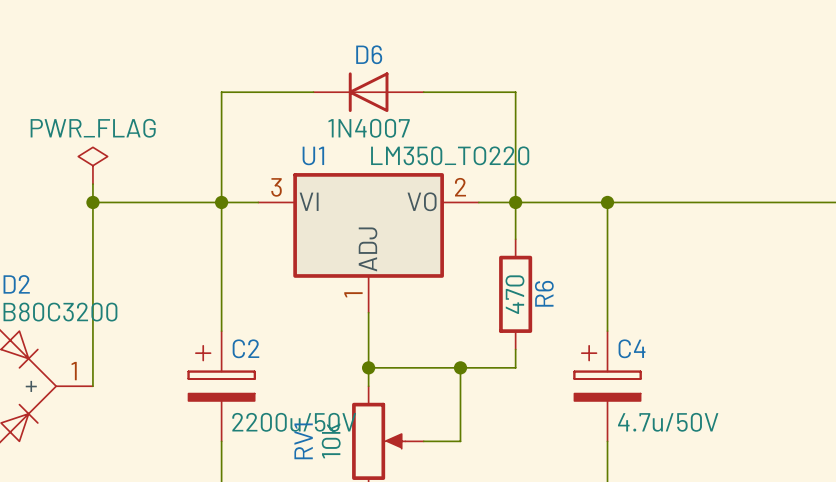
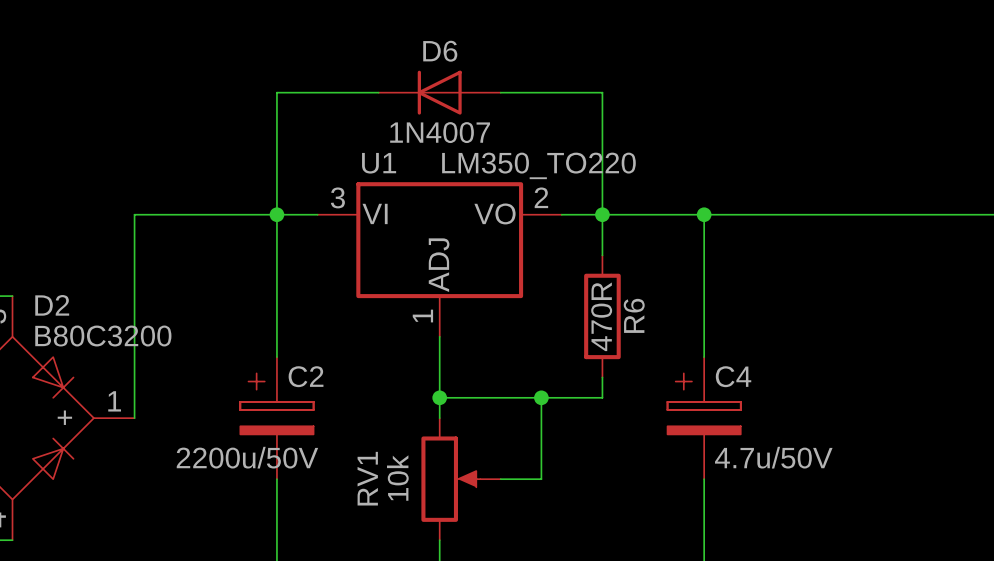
power symbol: PWR_FLAG (92, 165) -> none
wire: (92, 184) (92, 202) -> none
junction: (92, 202) -> none
R6 value: 470 (514, 294) -> 470R (601, 316)
C2 value position: 2200u/50V (294, 422) -> 2200u/50V (247, 457)

